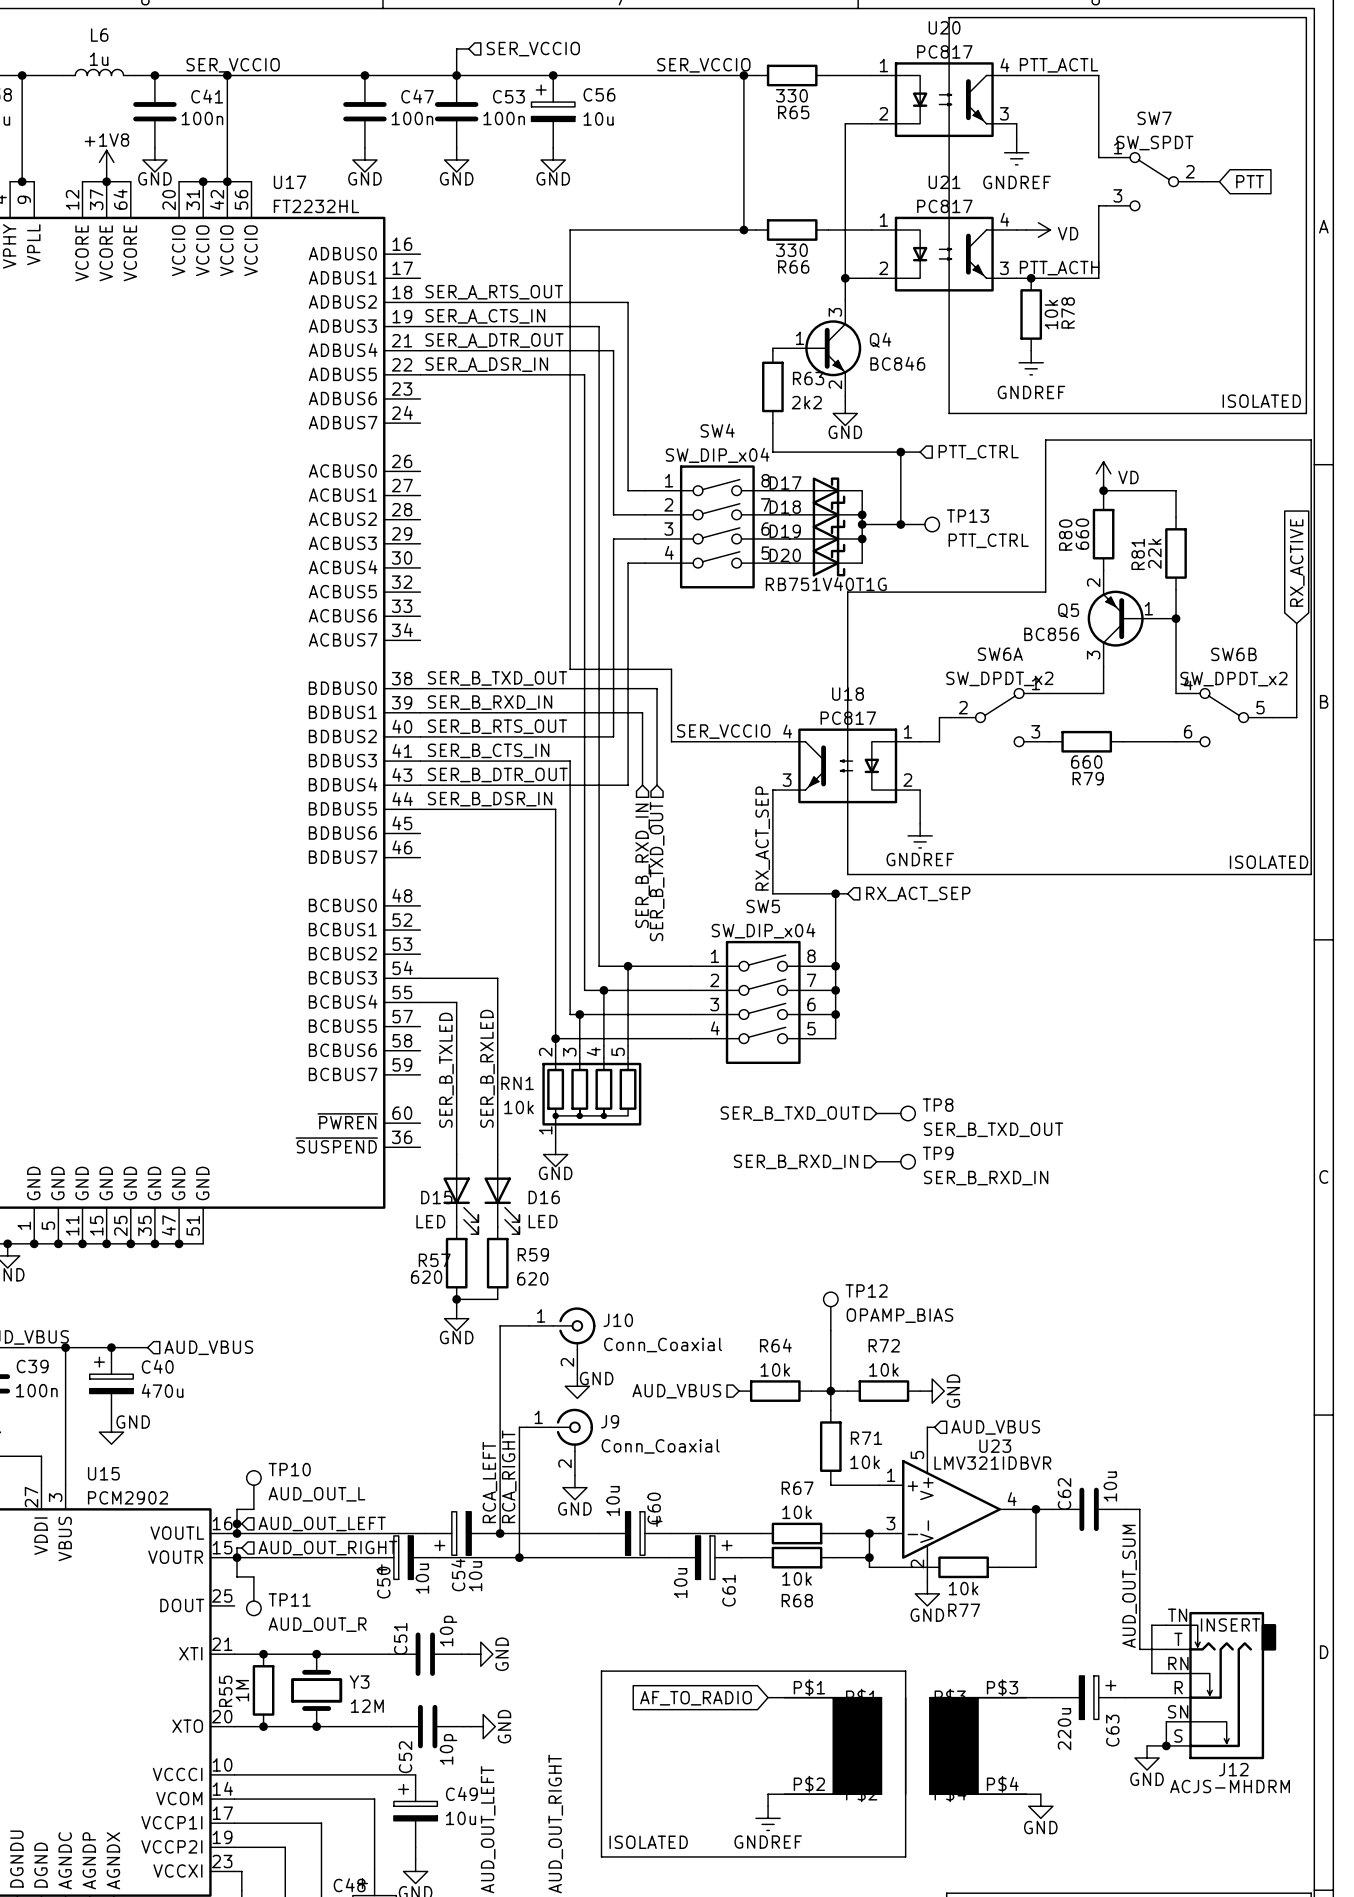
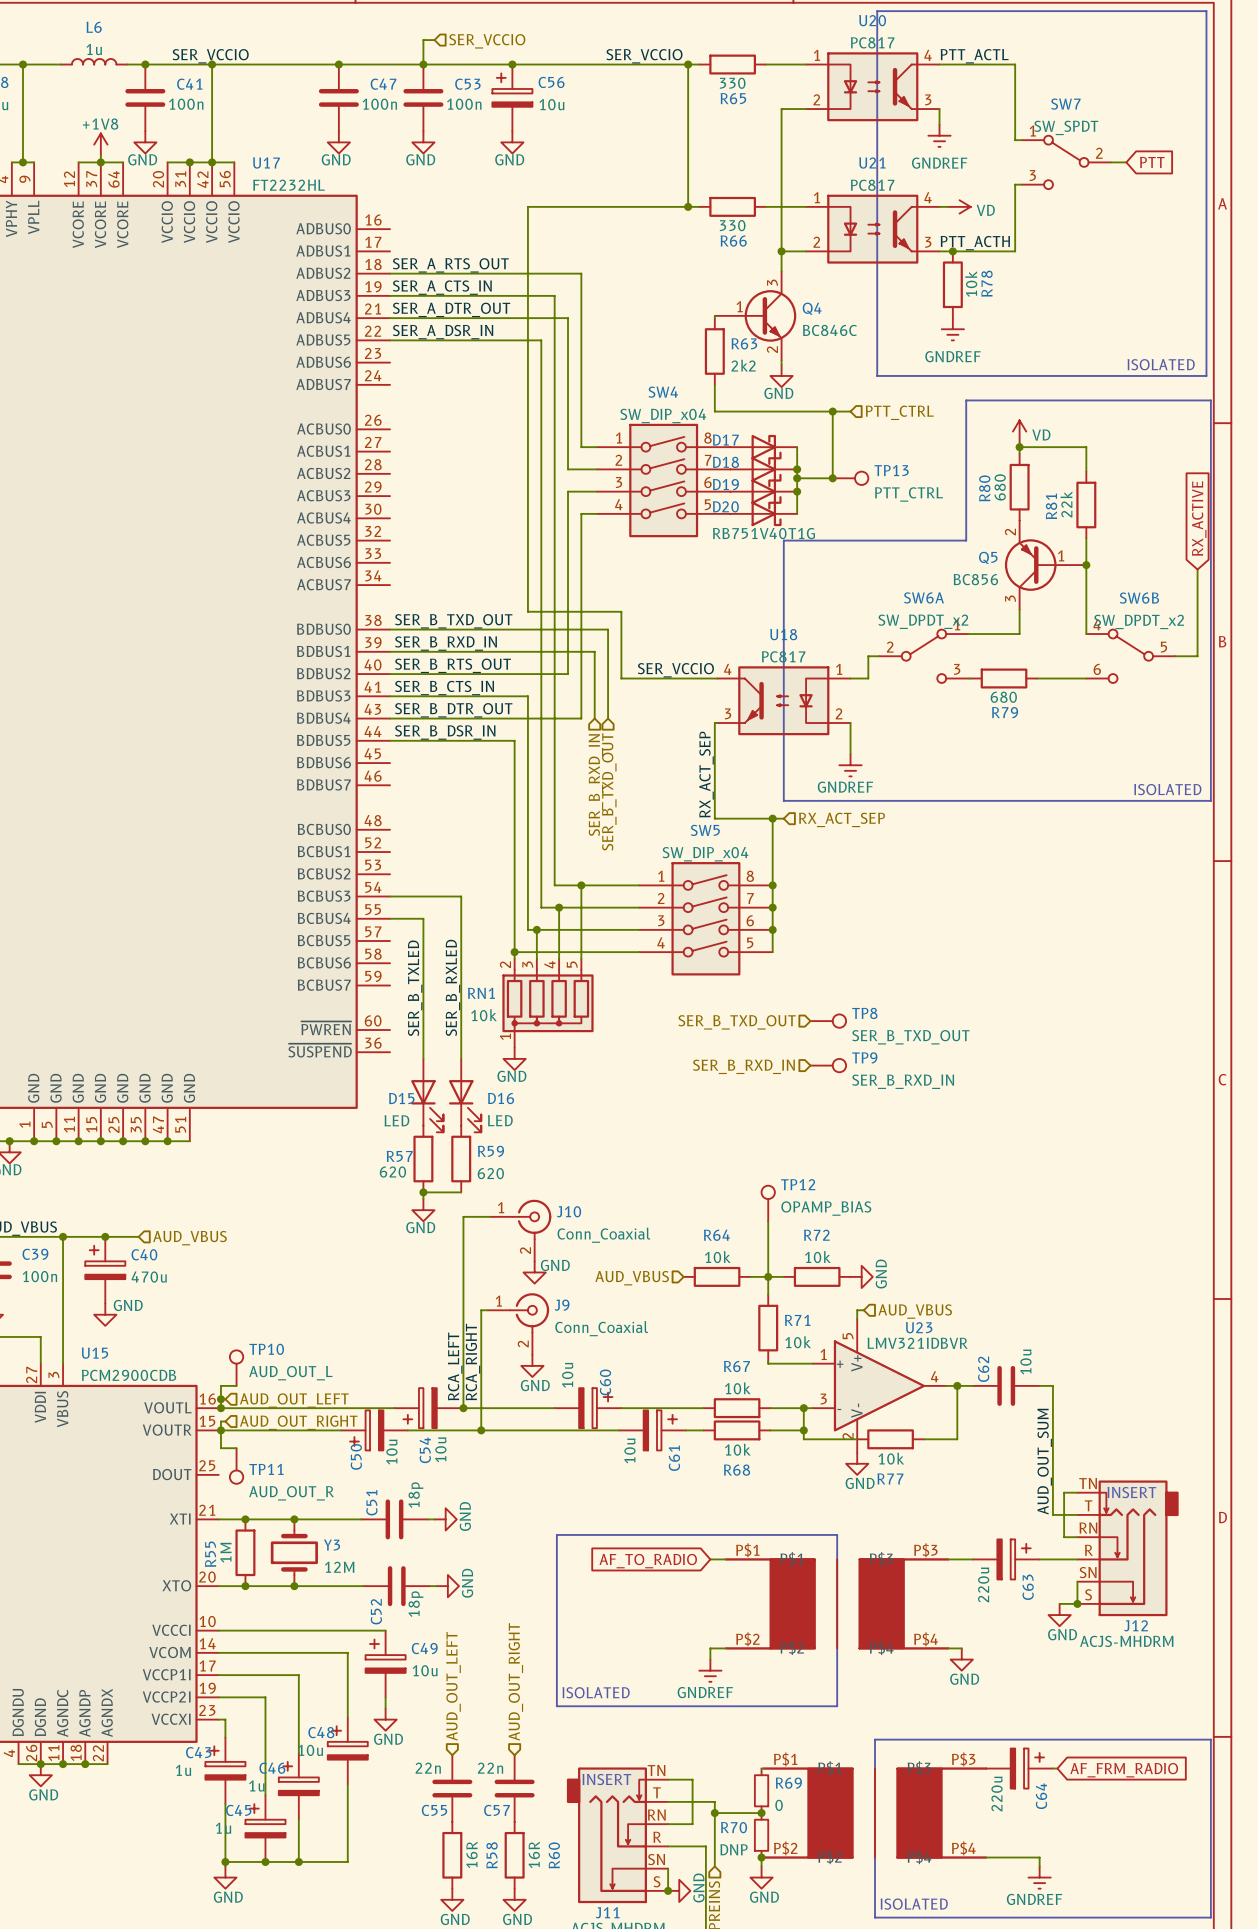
Q4 value: BC846 (897, 363) -> BC846C (829, 330)
R80 value: 660 (1082, 534) -> 680 (1000, 487)
R79 value: 660 (1086, 762) -> 680 (1003, 697)
U15 value: PCM2902 (128, 1497) -> PCM2900CDB (129, 1375)
C51 value: 10p (448, 1631) -> 18p (415, 1495)
C52 value: 10p (448, 1749) -> 18p (415, 1604)

